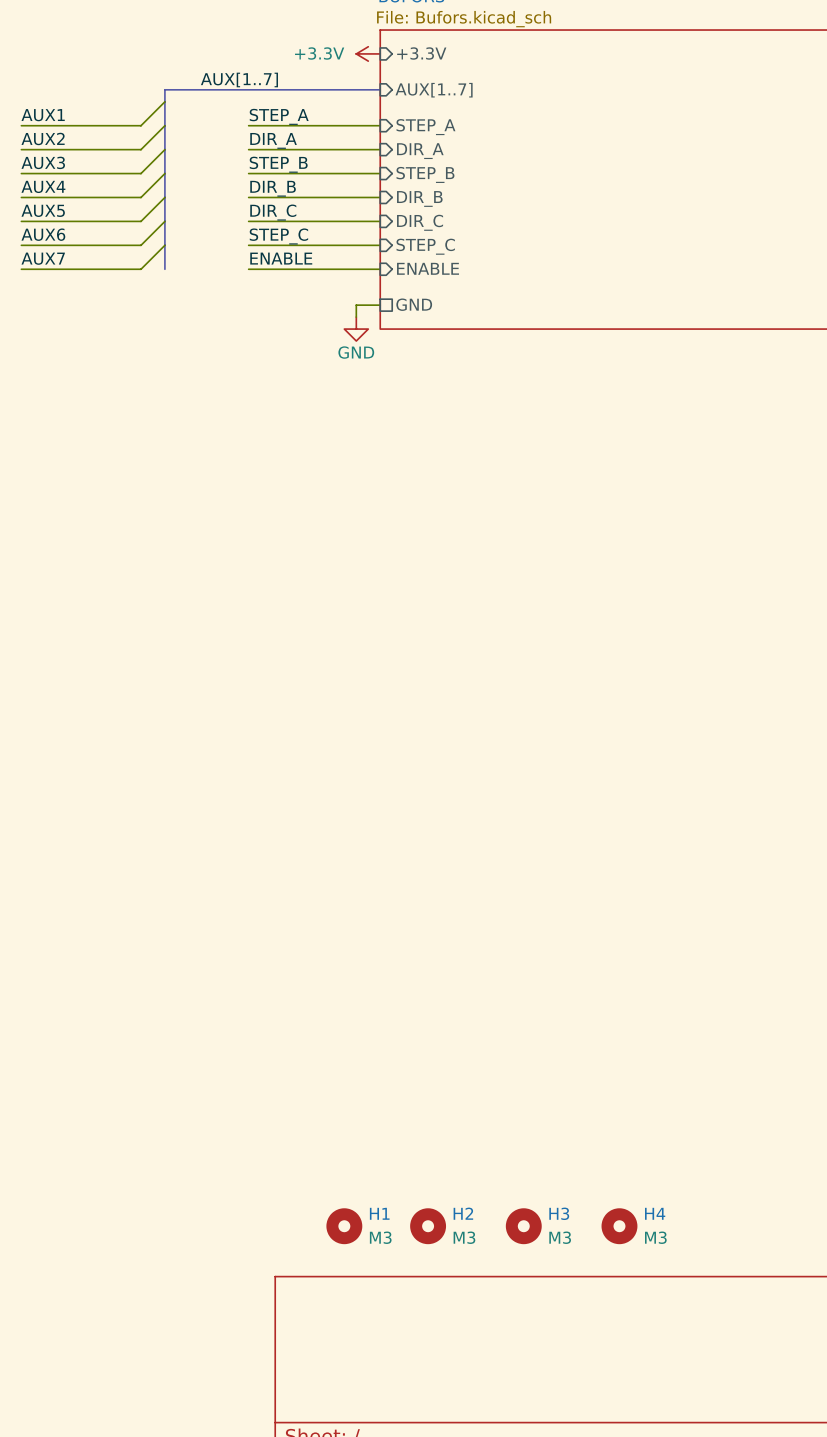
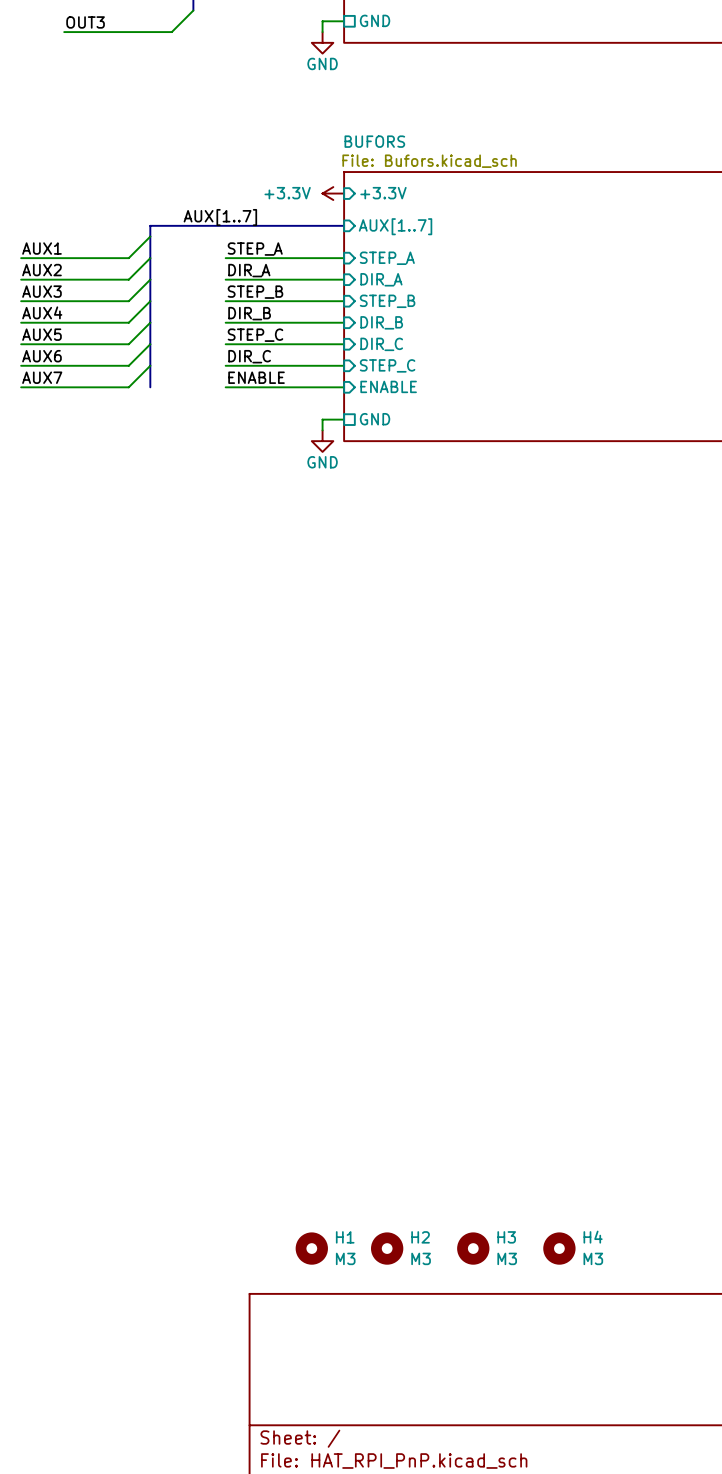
label: DIR_C (273, 212) -> STEP_C (255, 335)
label: STEP_C (278, 236) -> DIR_C (249, 356)

